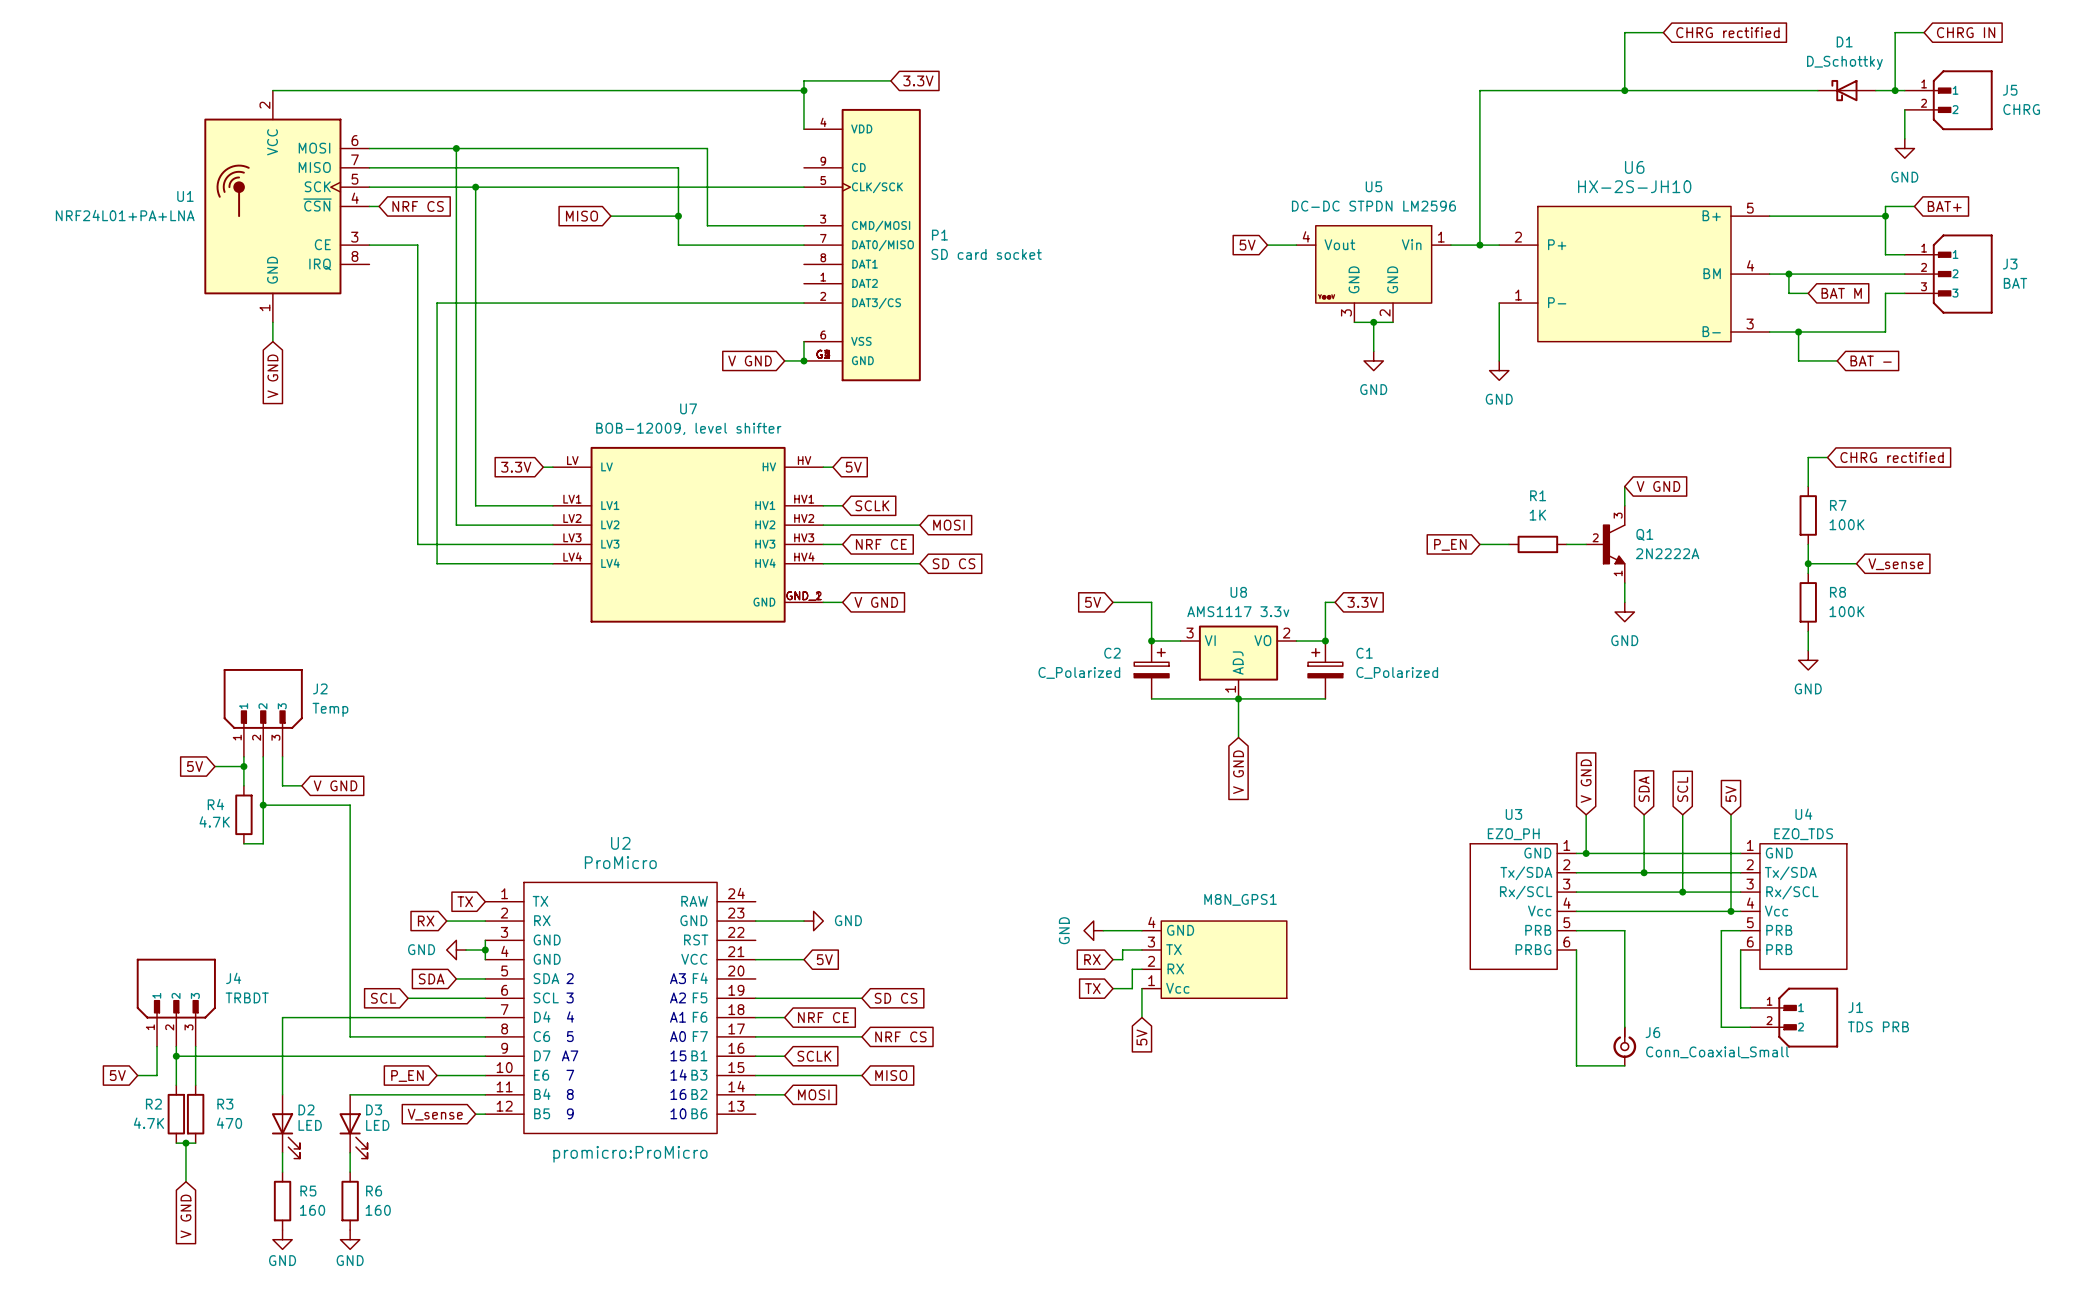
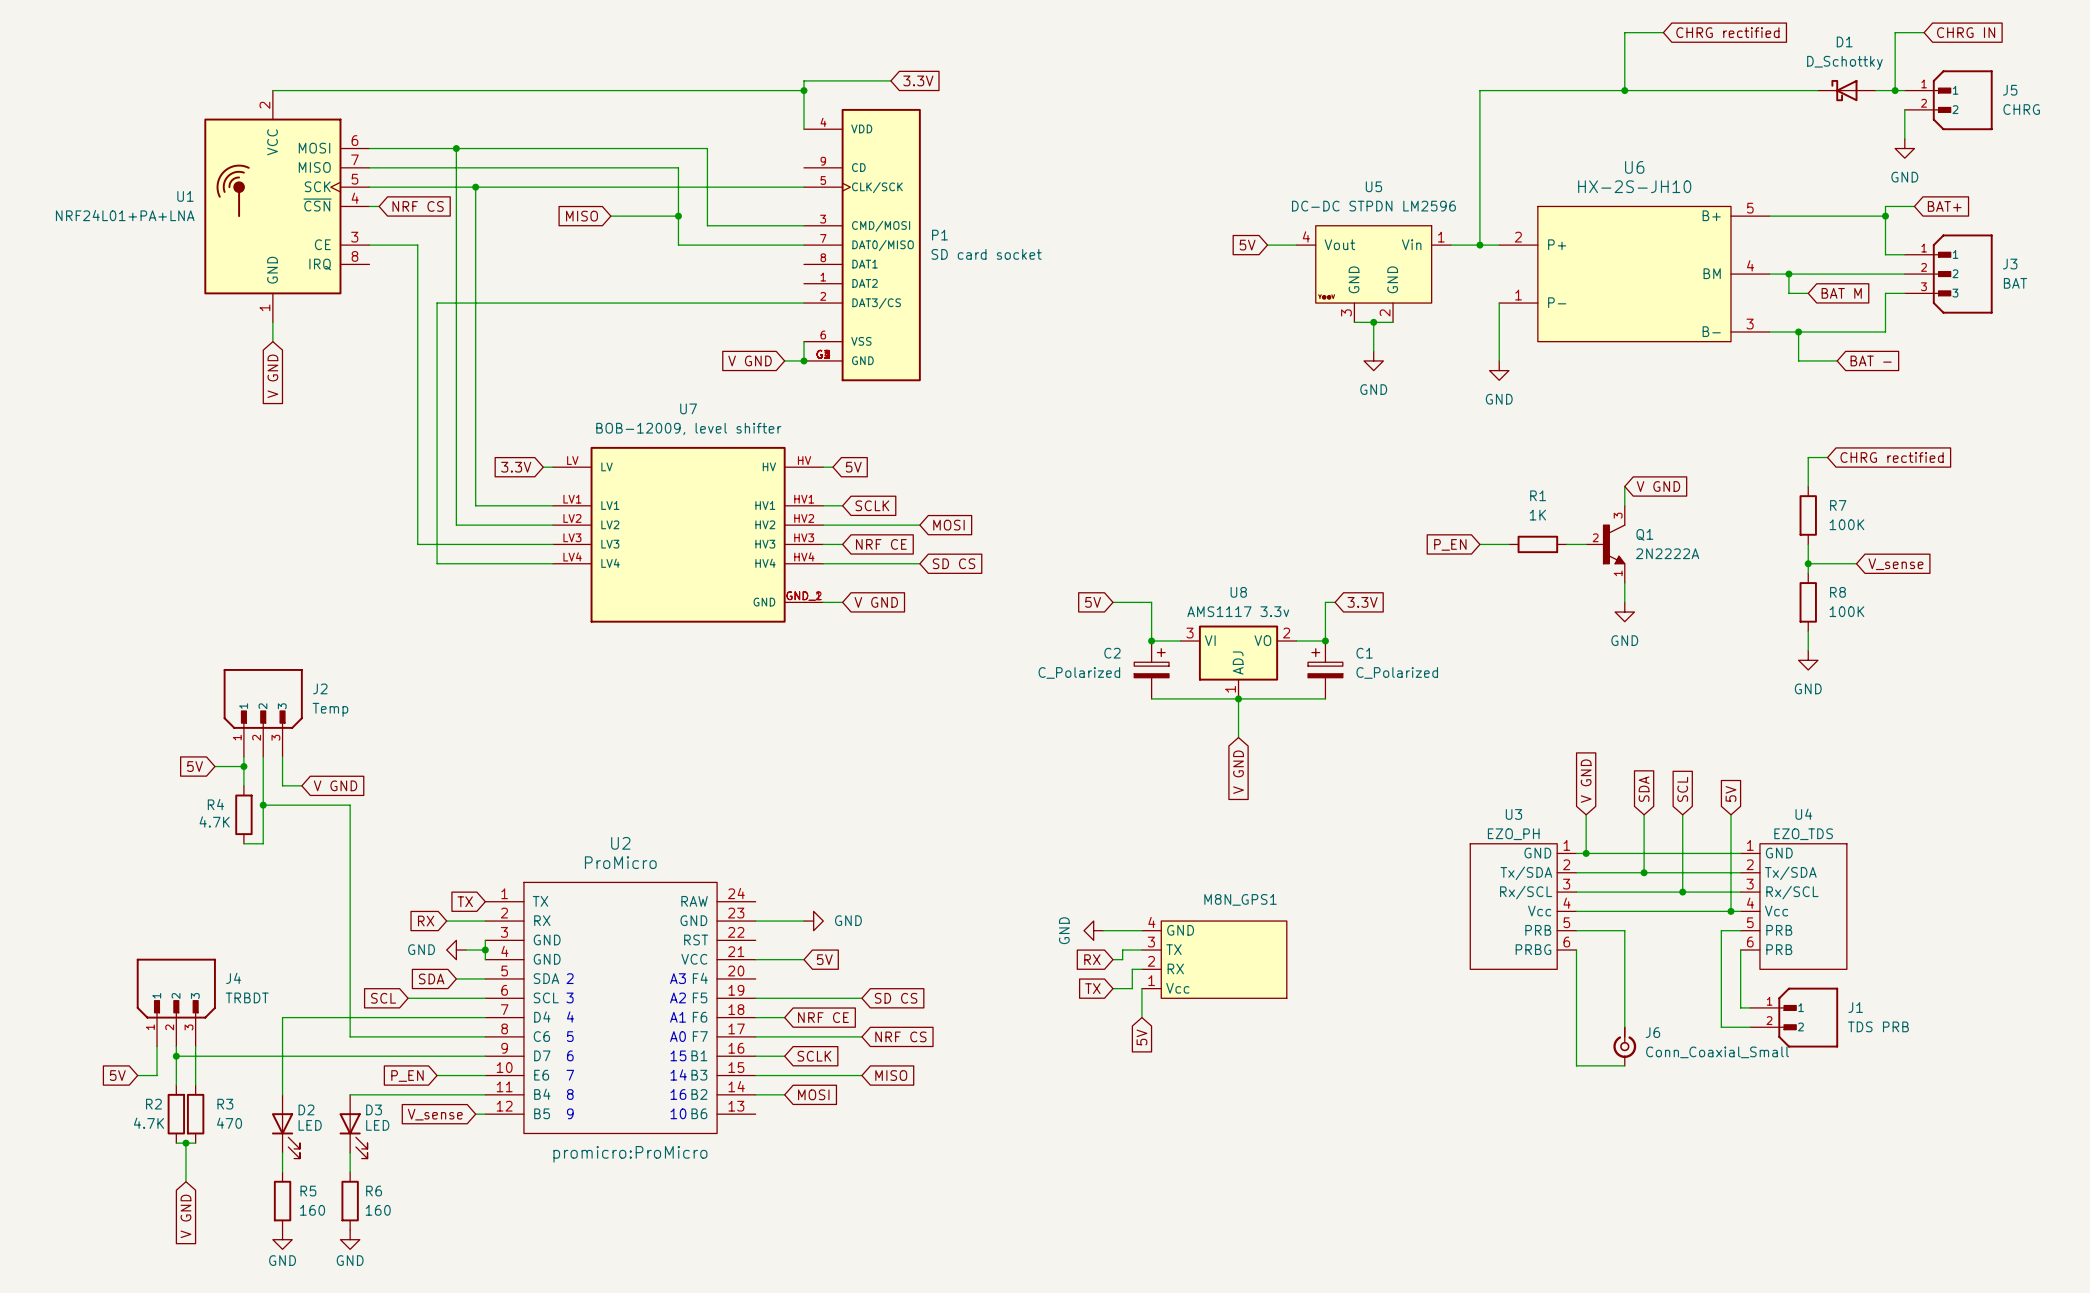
text: A7 (570, 1055) -> 6 (570, 1055)

